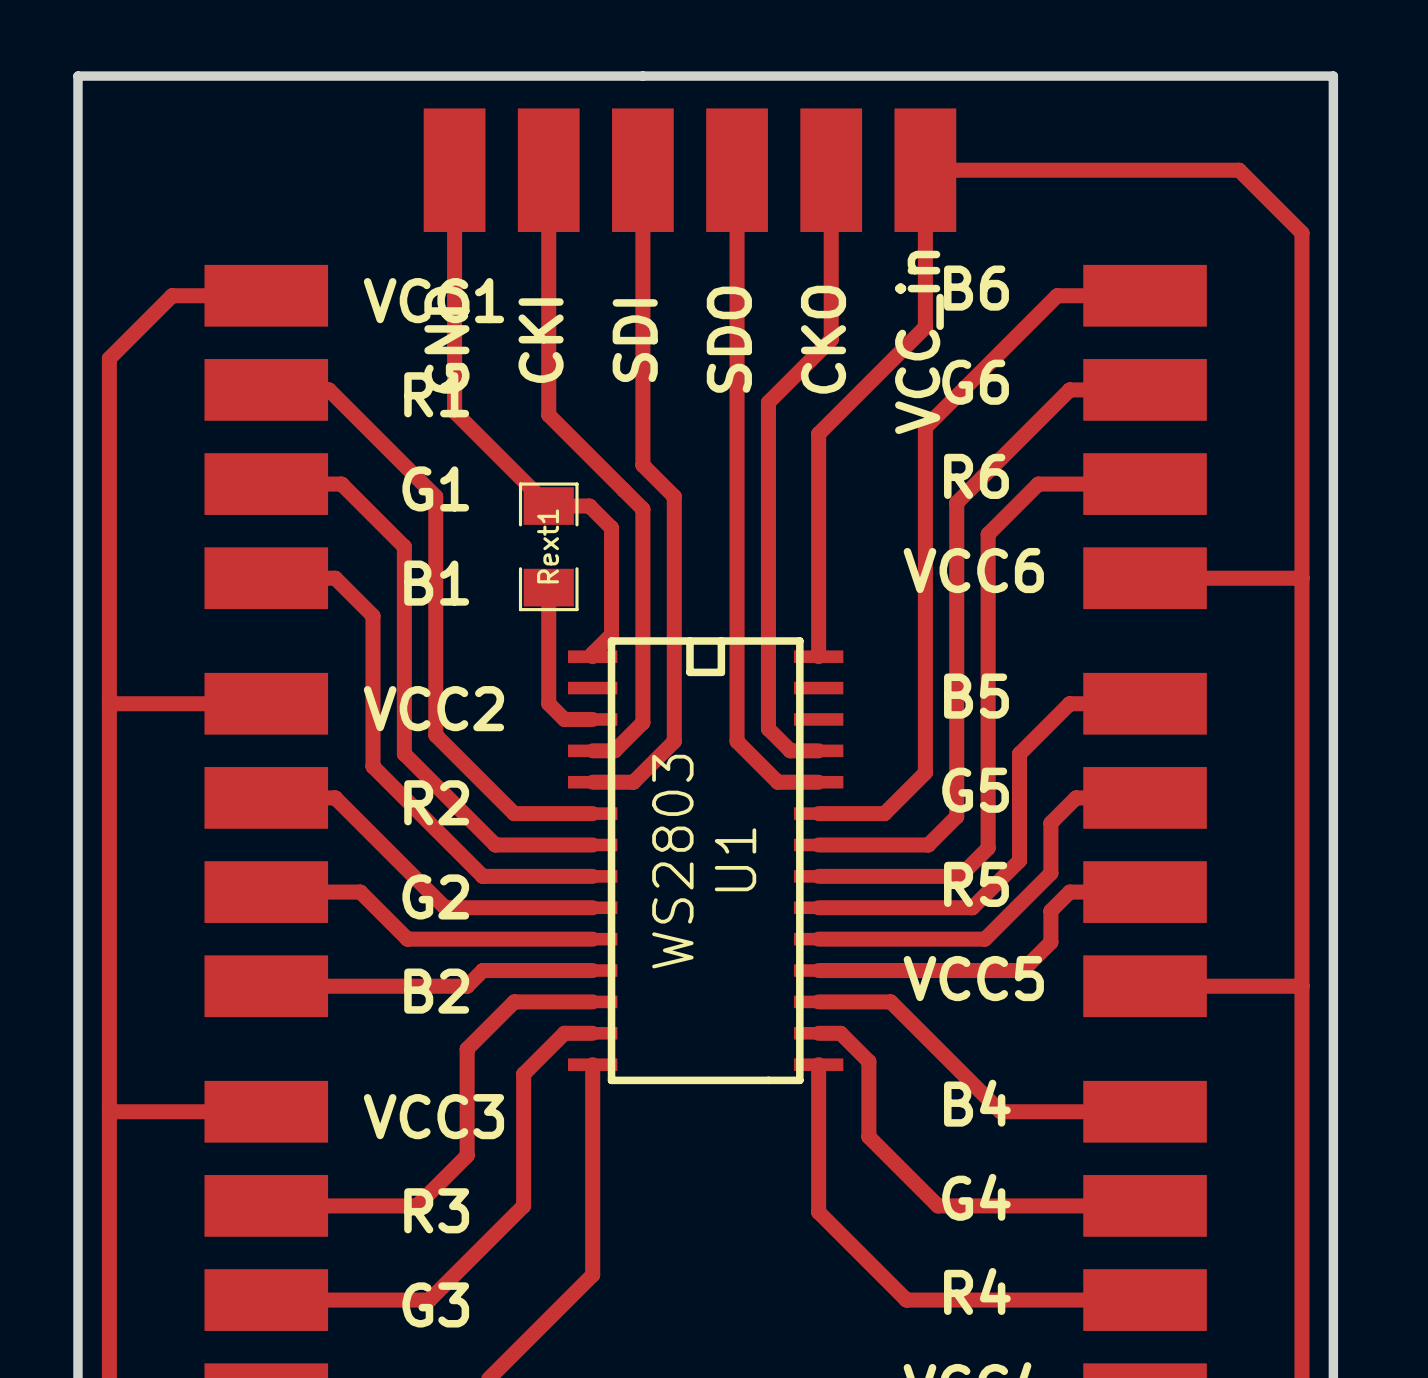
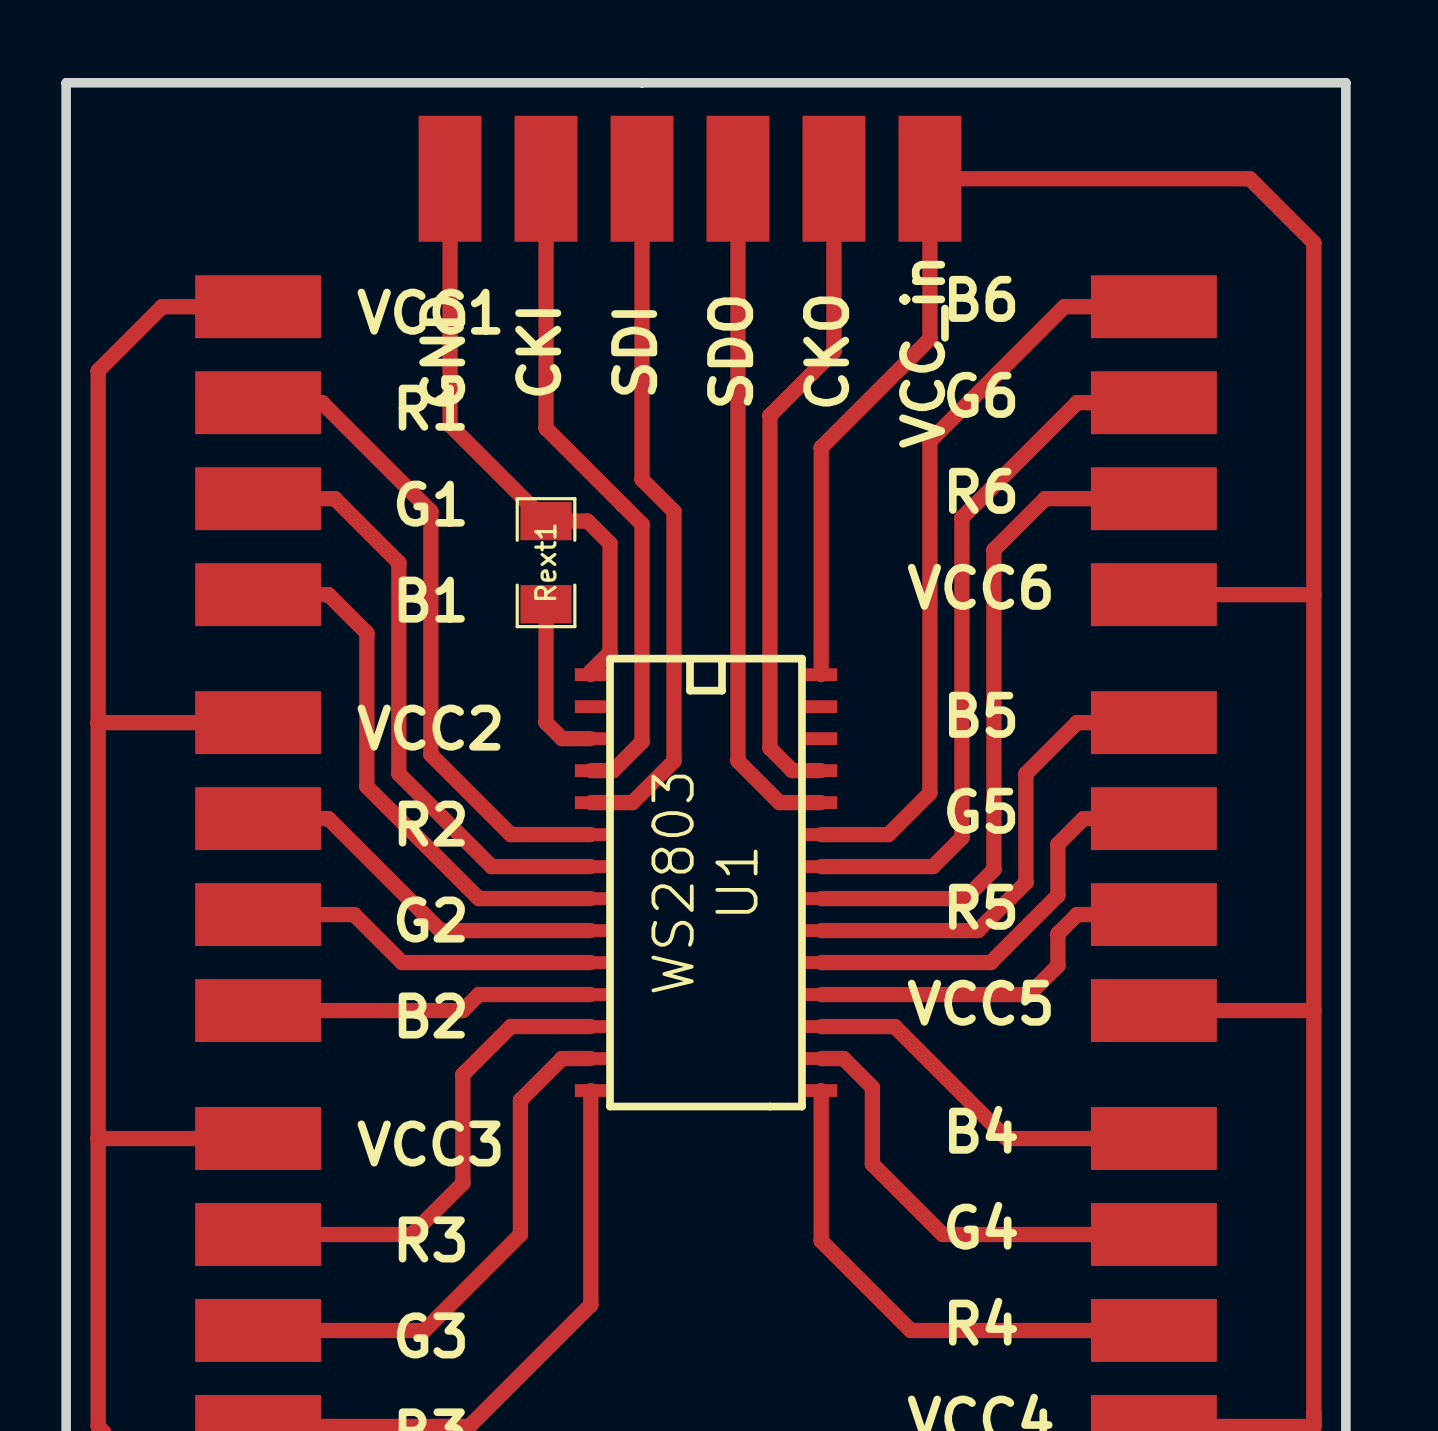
U1 footprint: [567, 637, 844, 1085] -> [574, 654, 838, 1111]

